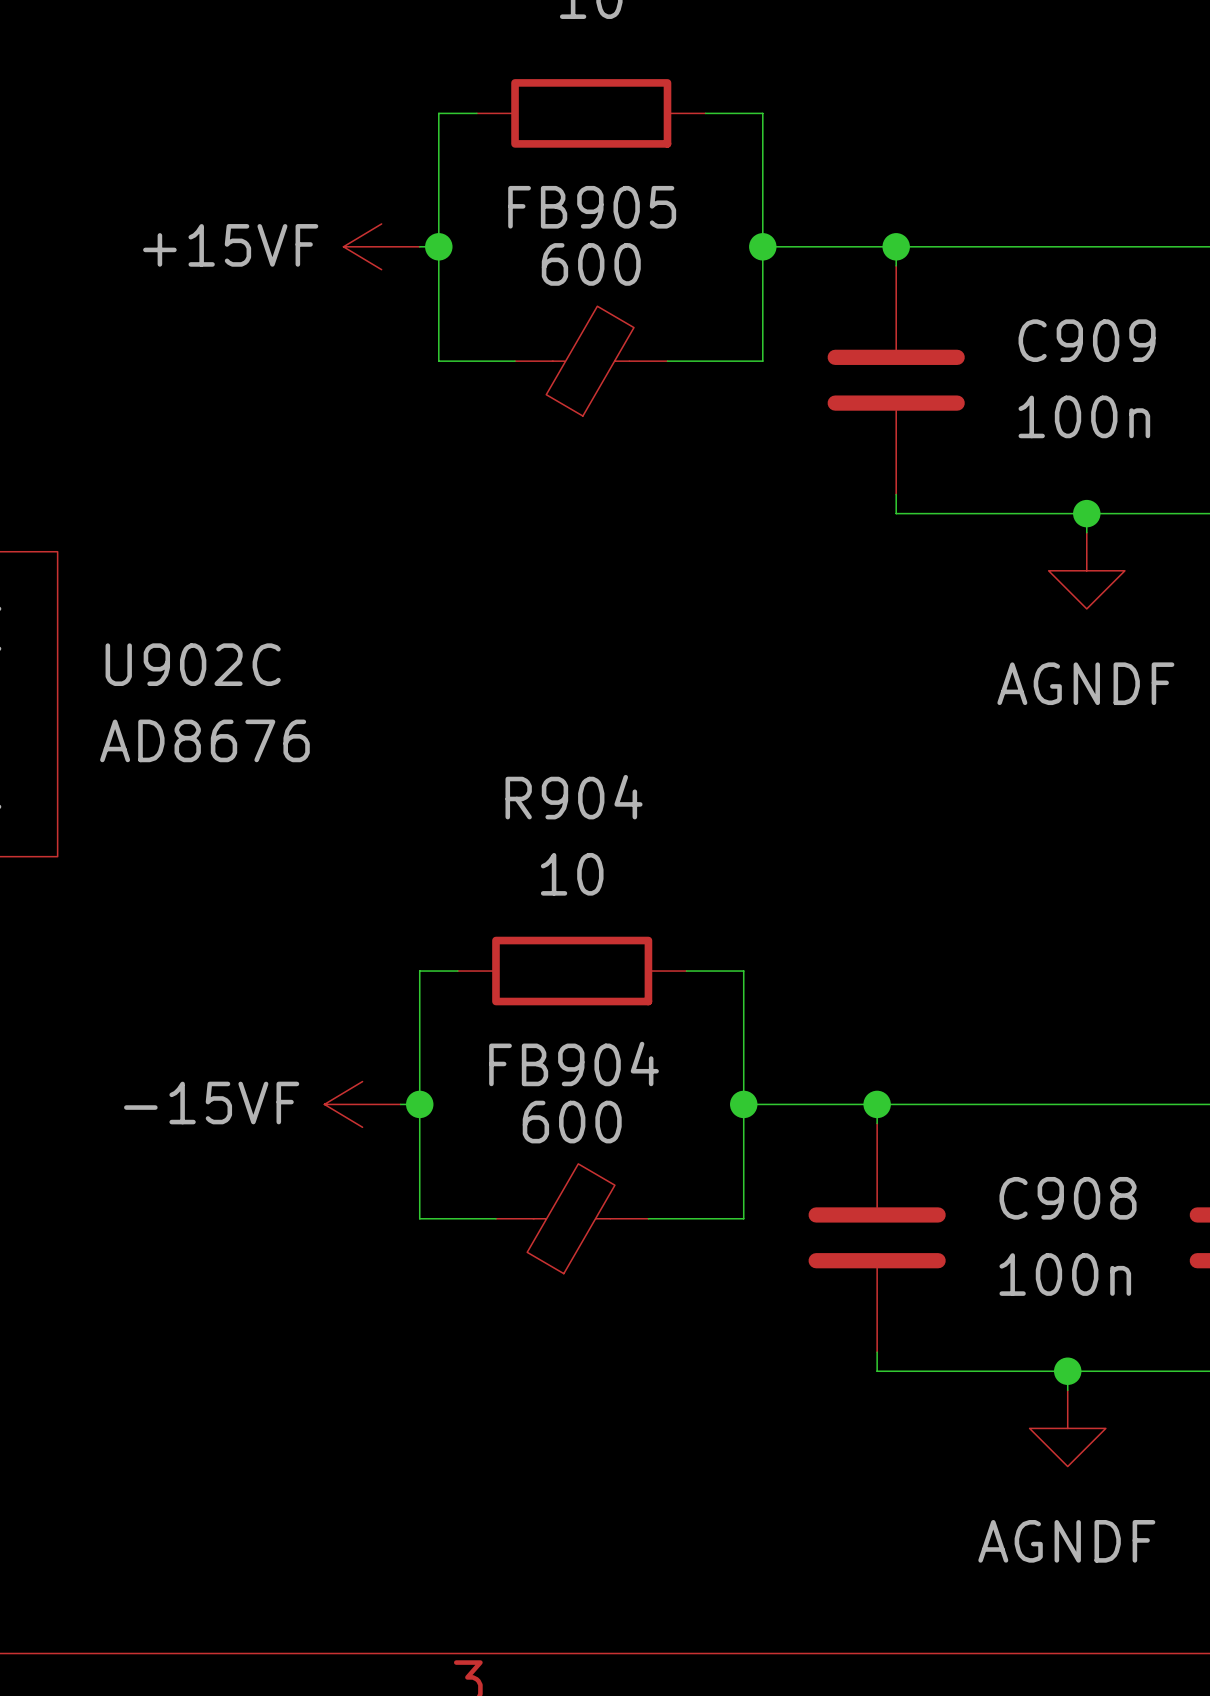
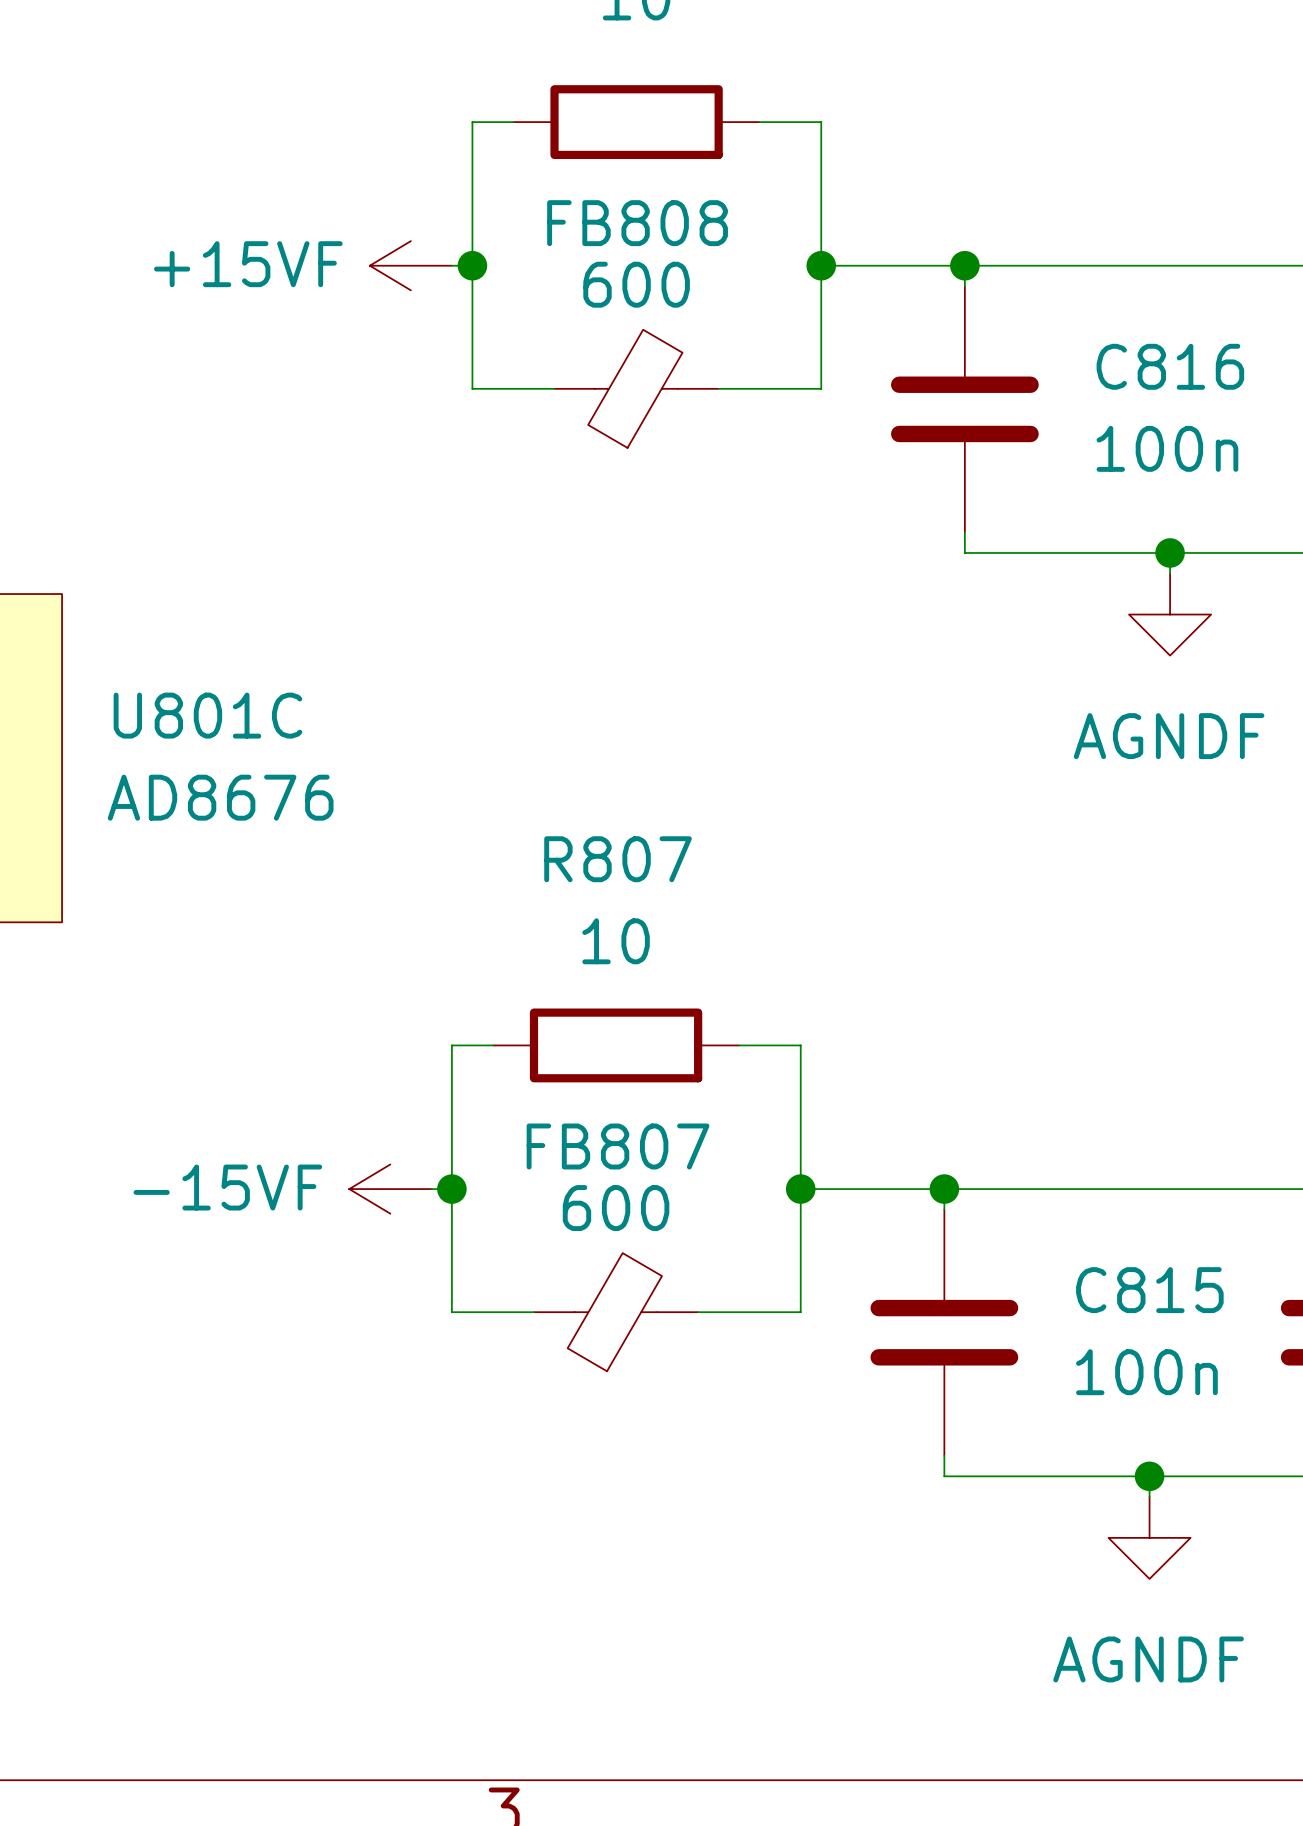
FB905 name: FB905 (592, 207) -> FB808 (637, 223)
C909 name: C909 (1087, 340) -> C816 (1170, 366)
U902C name: U902C (193, 664) -> U801C (207, 715)
R904 name: R904 (574, 797) -> R807 (618, 859)
FB904 name: FB904 (574, 1063) -> FB807 (618, 1146)
C908 name: C908 (1068, 1198) -> C815 (1149, 1290)

